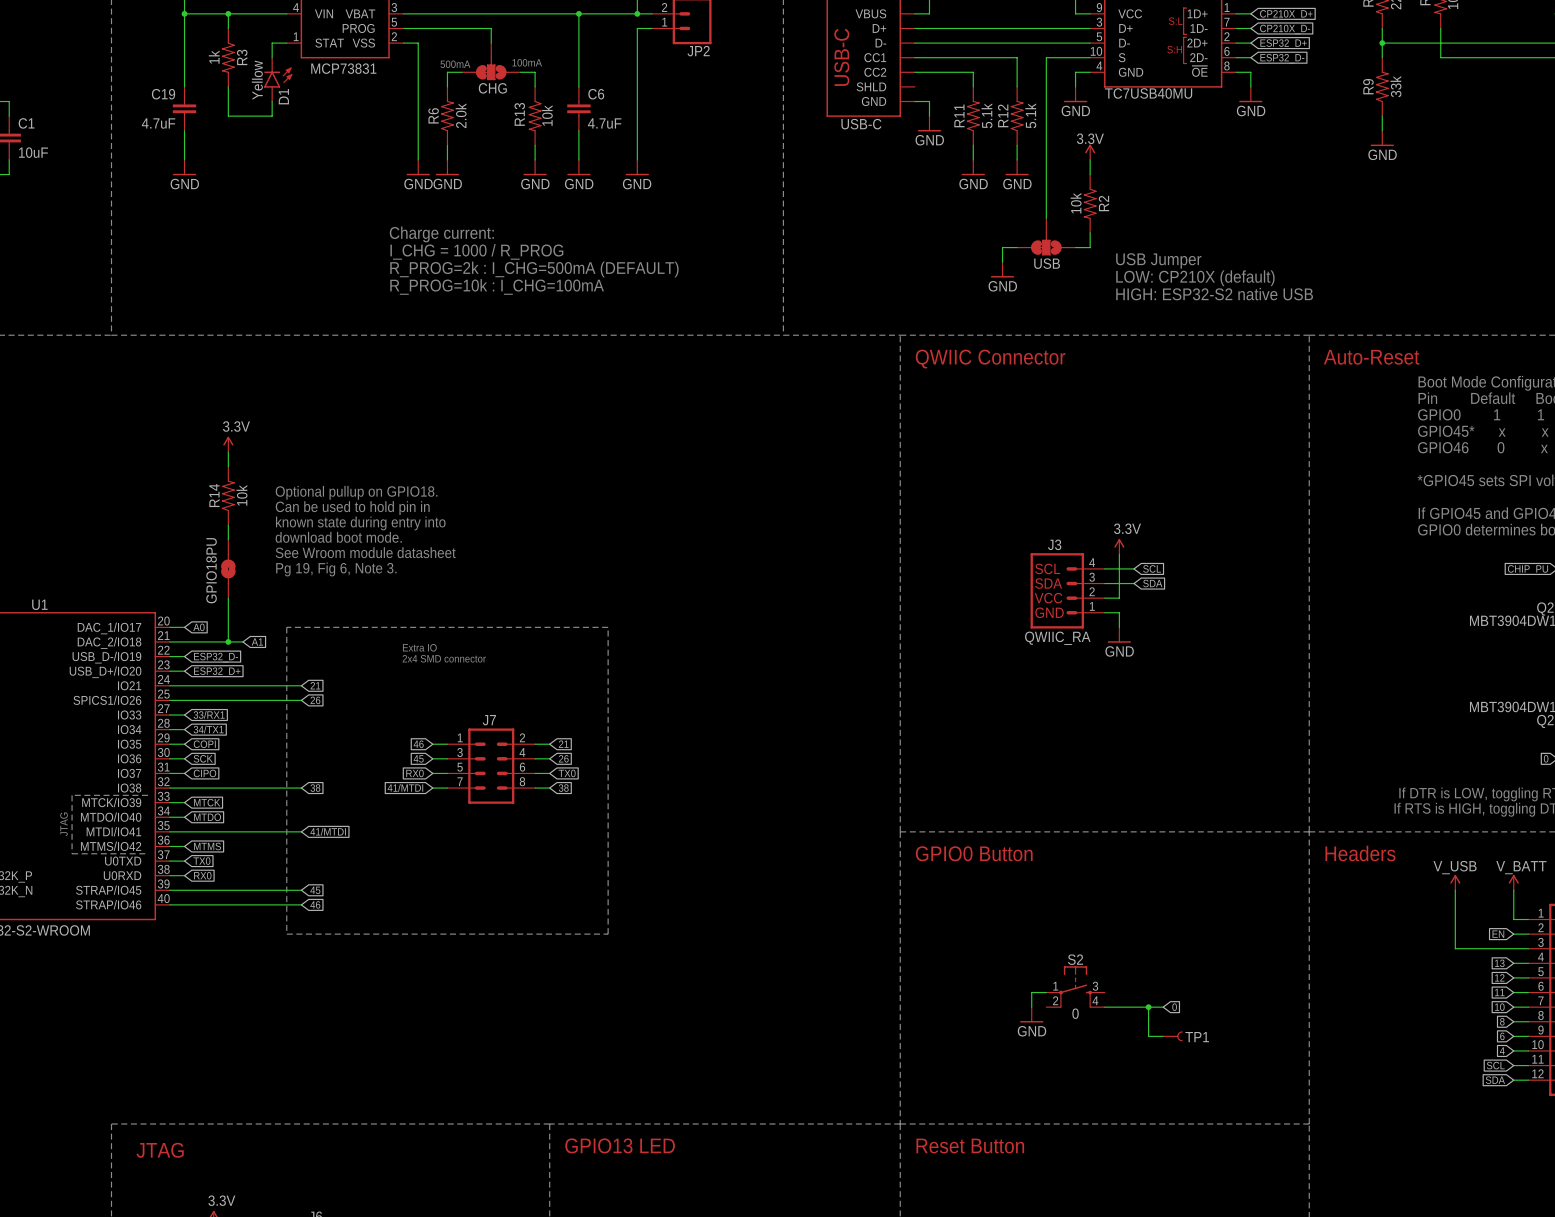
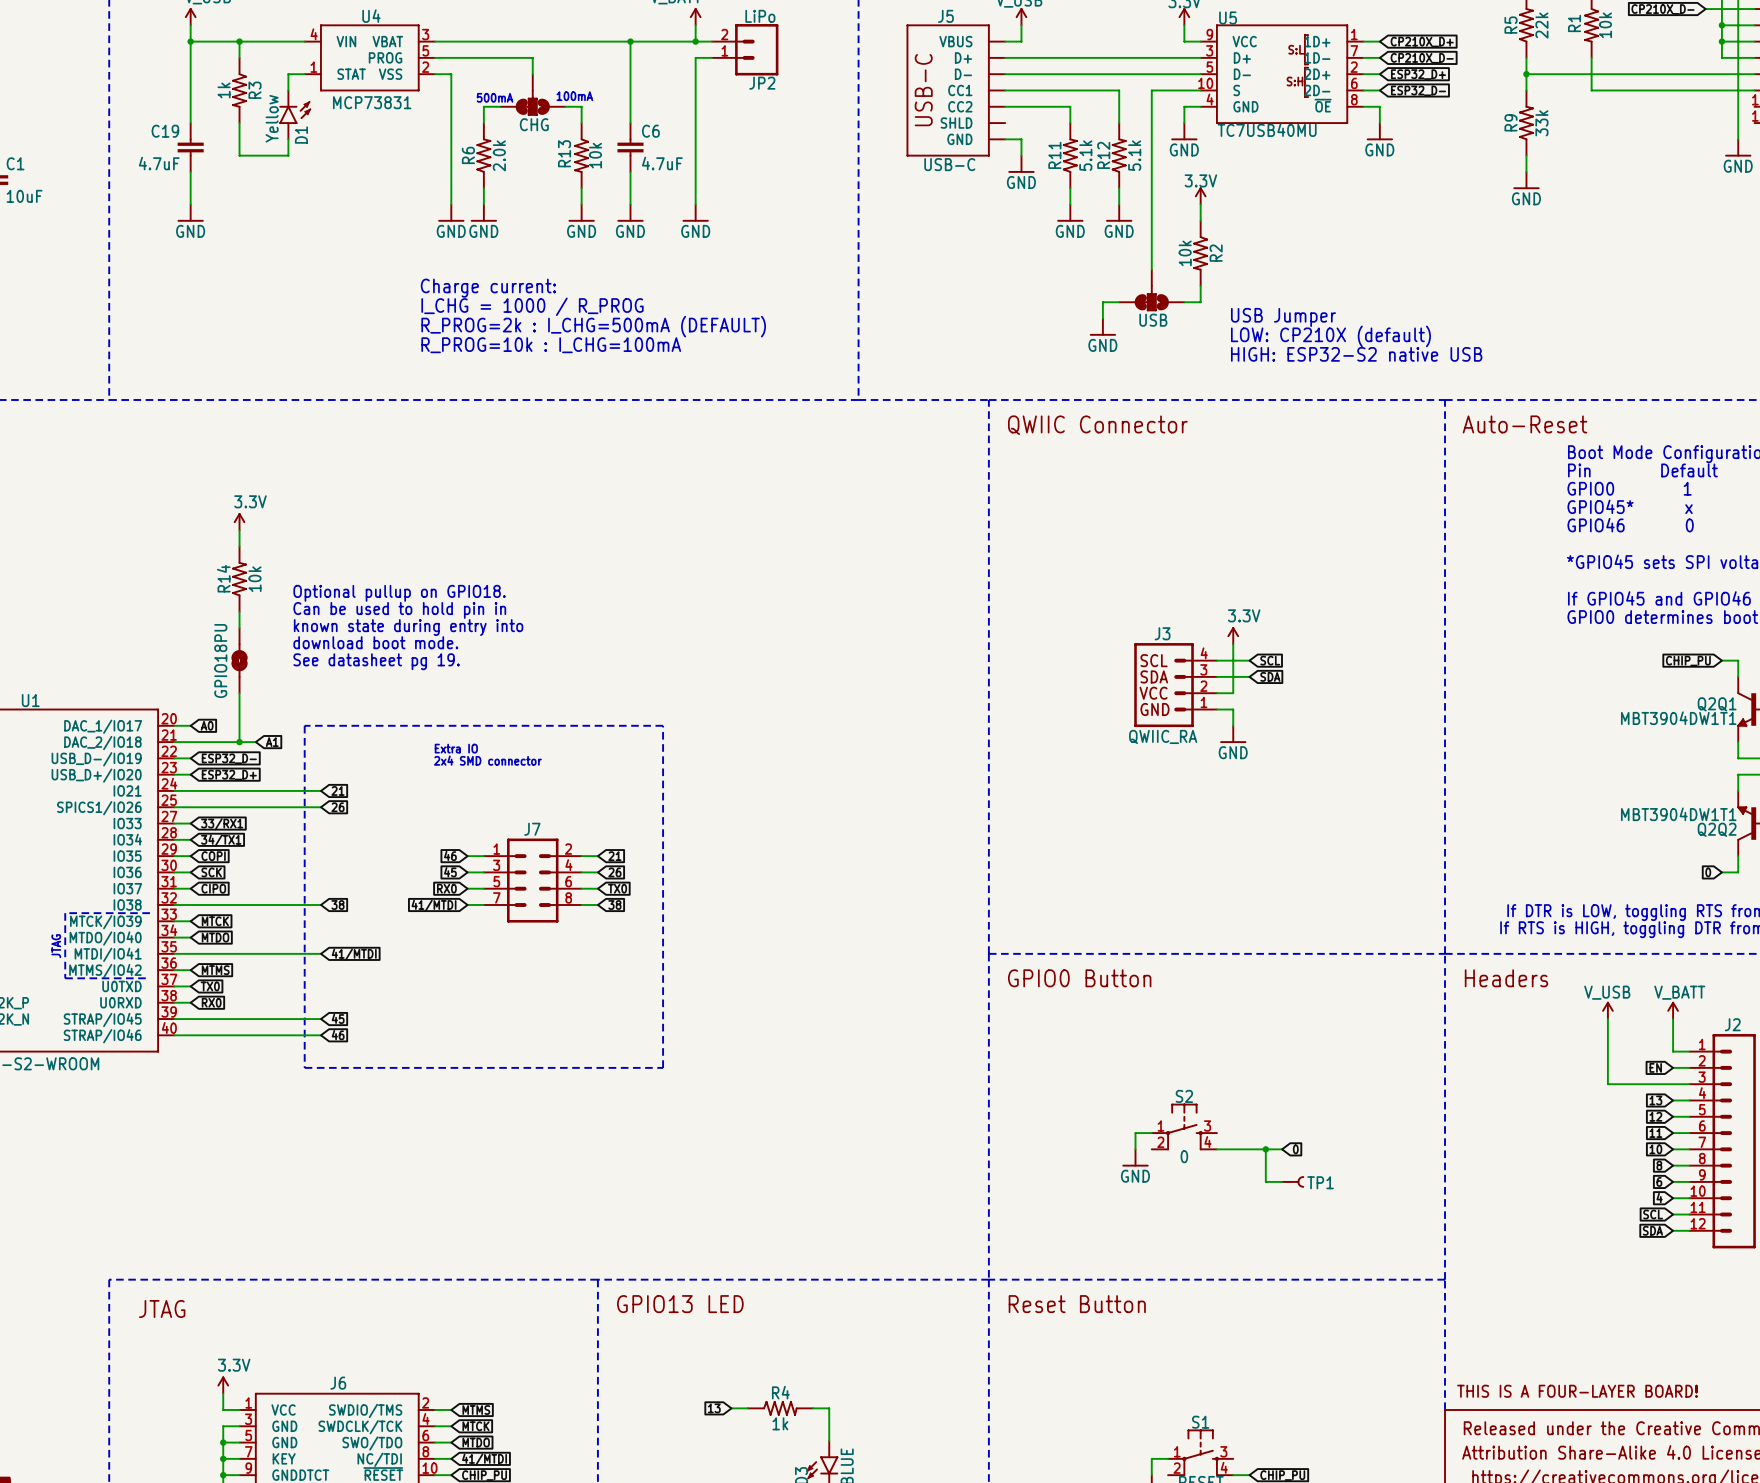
text: Optional pullup on GPIO18. (356, 492) -> none
text: Can be used to hold pin in (352, 508) -> Optional pullup on GPIO18. (399, 593)
text: known state during entry into (360, 523) -> Can be used to hold pin in (399, 610)
text: download boot mode. (338, 537) -> known state during entry into (408, 627)
text: See Wroom module datasheet (365, 552) -> download boot mode. (375, 642)
text: Pg 19, Fig 6, Note 3. (336, 569) -> See datasheet pg 19. (376, 661)

